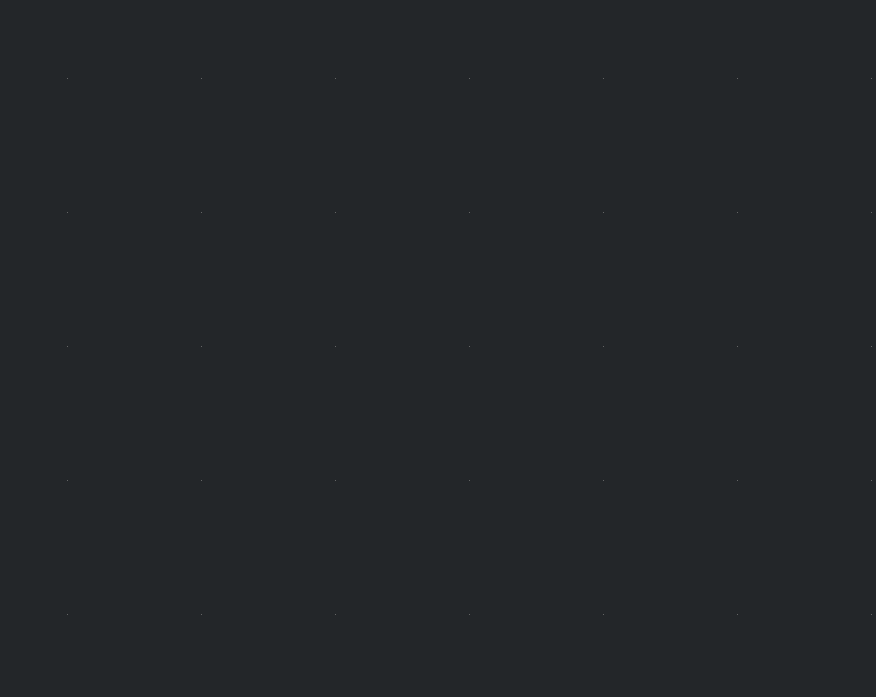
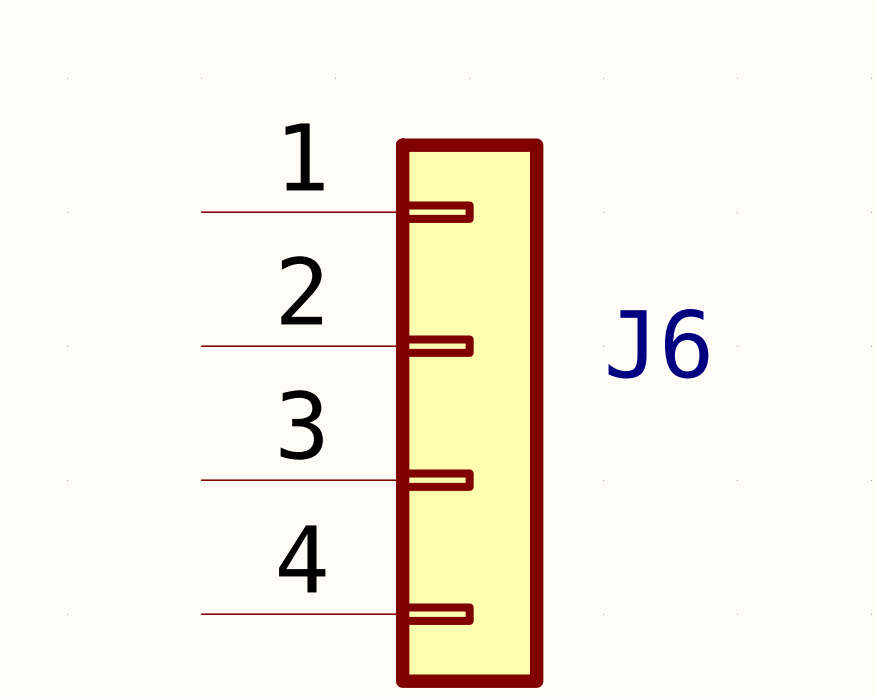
J6: none -> (372, 413)

